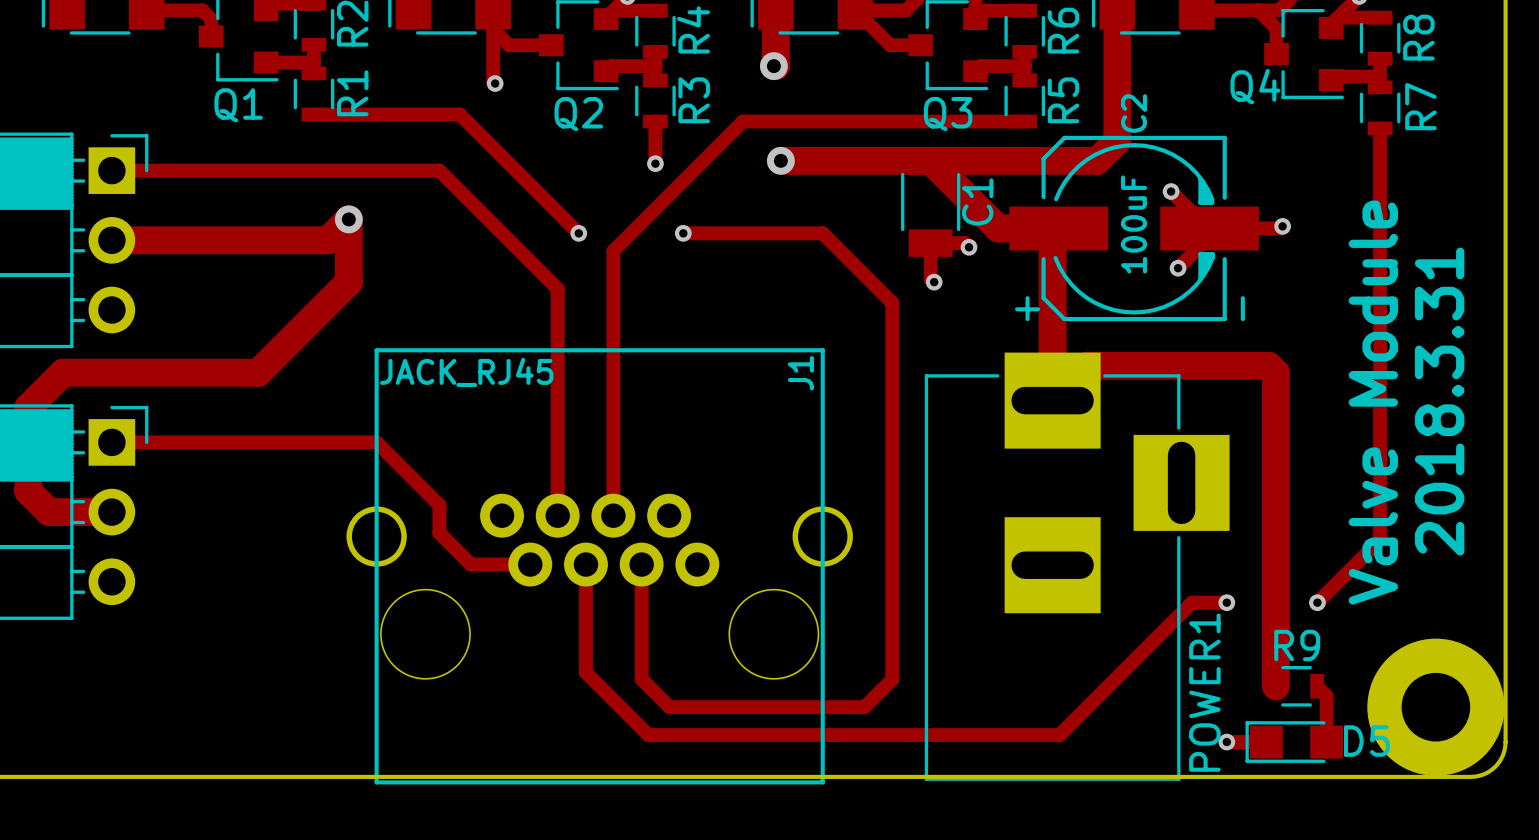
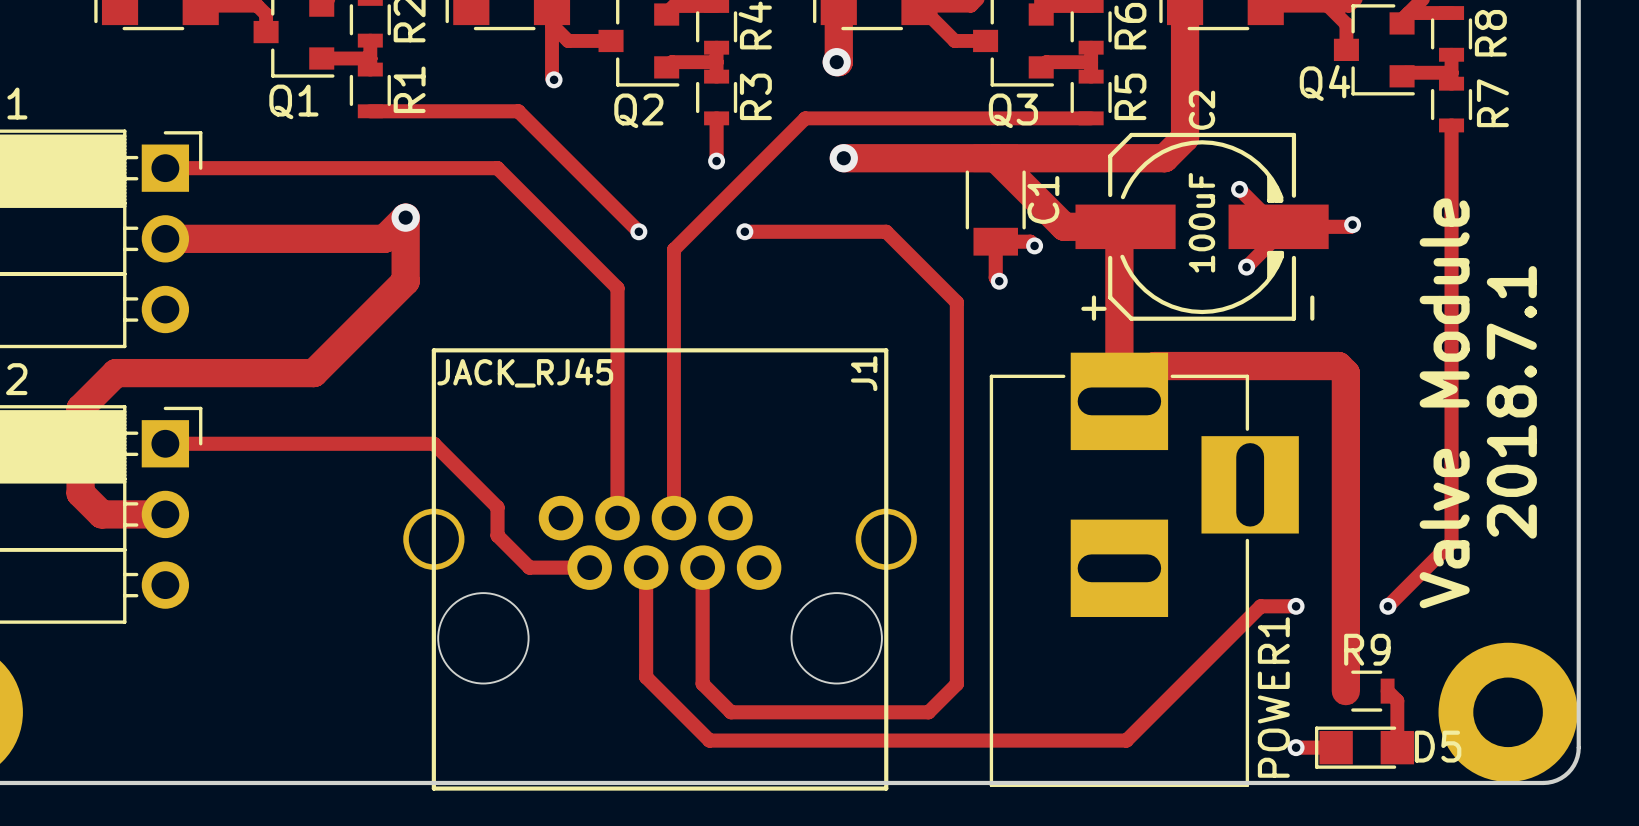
text: 2018.3.31 (1439, 401) -> 2018.7.1 (1511, 402)

